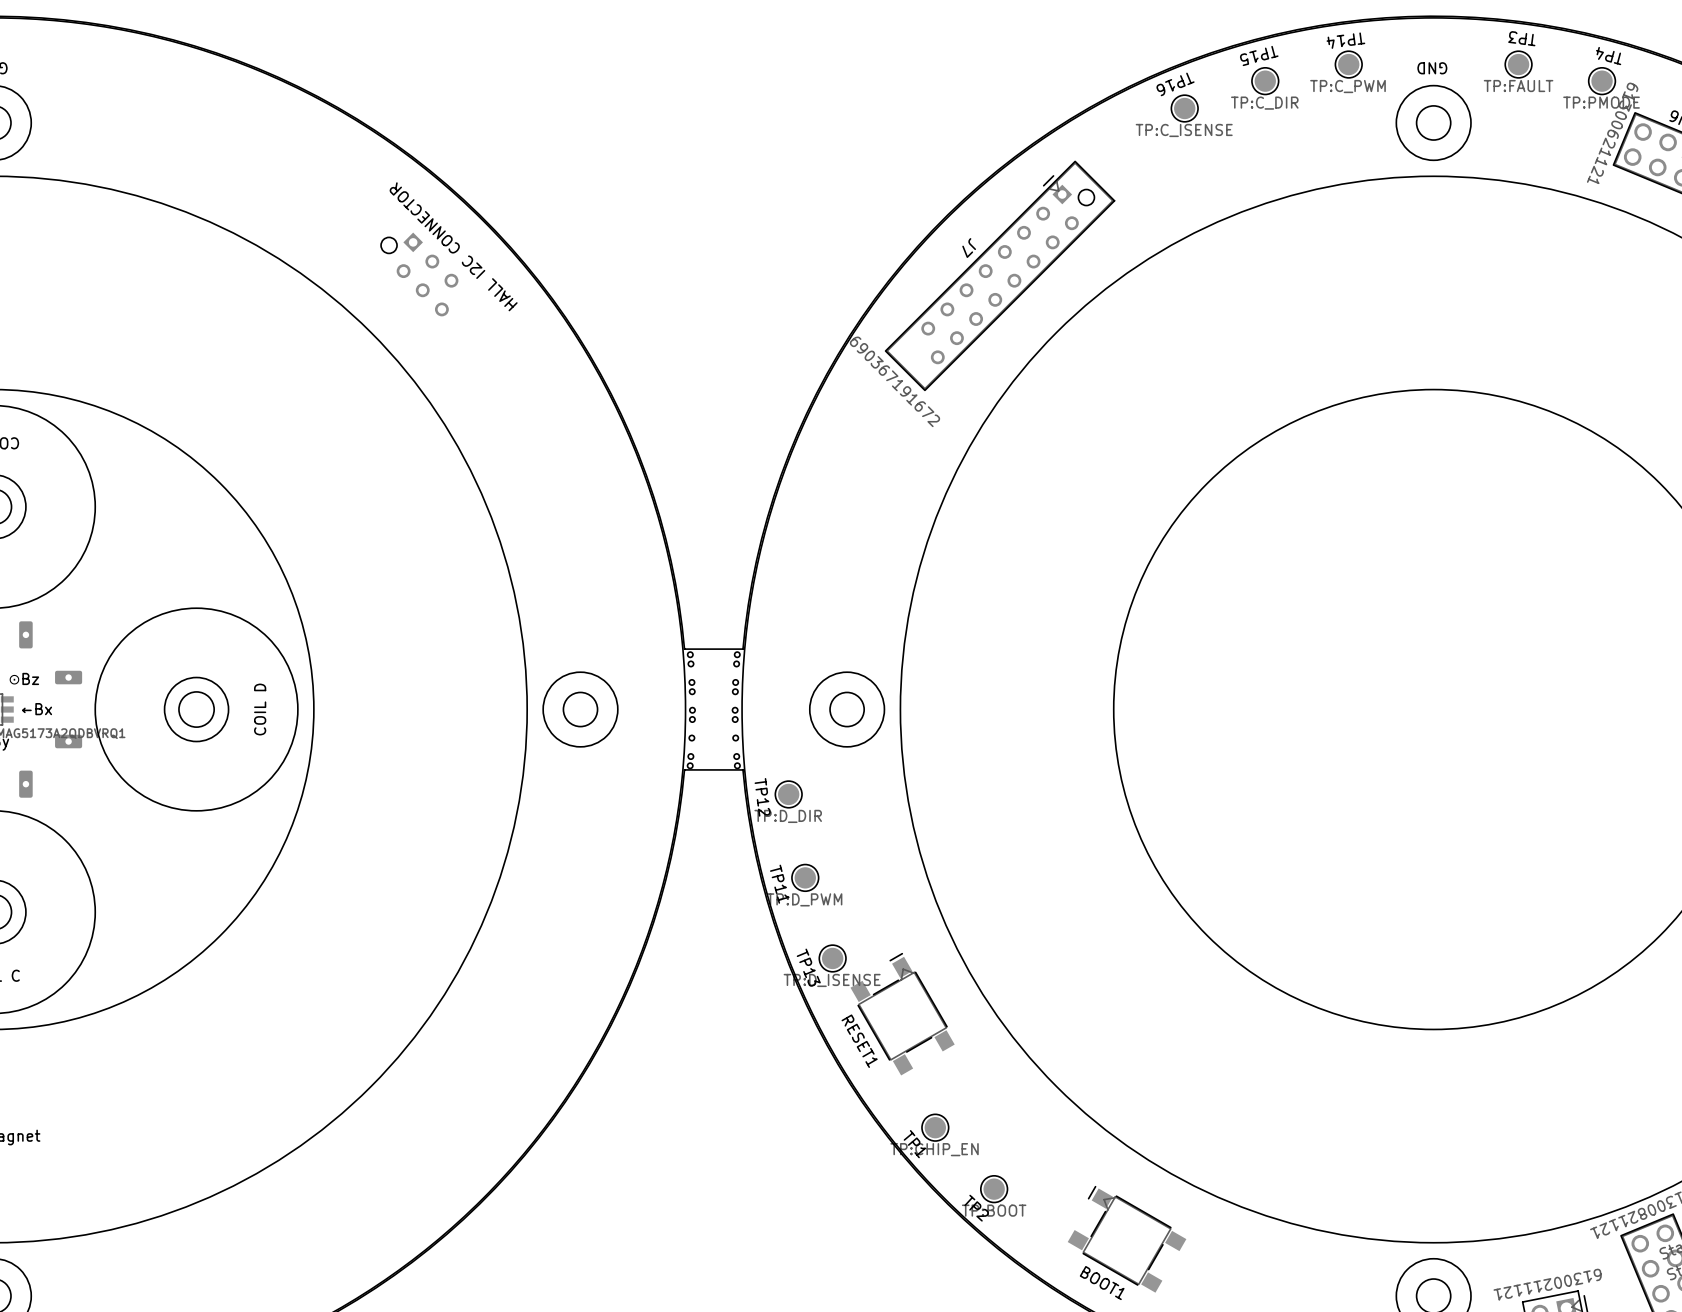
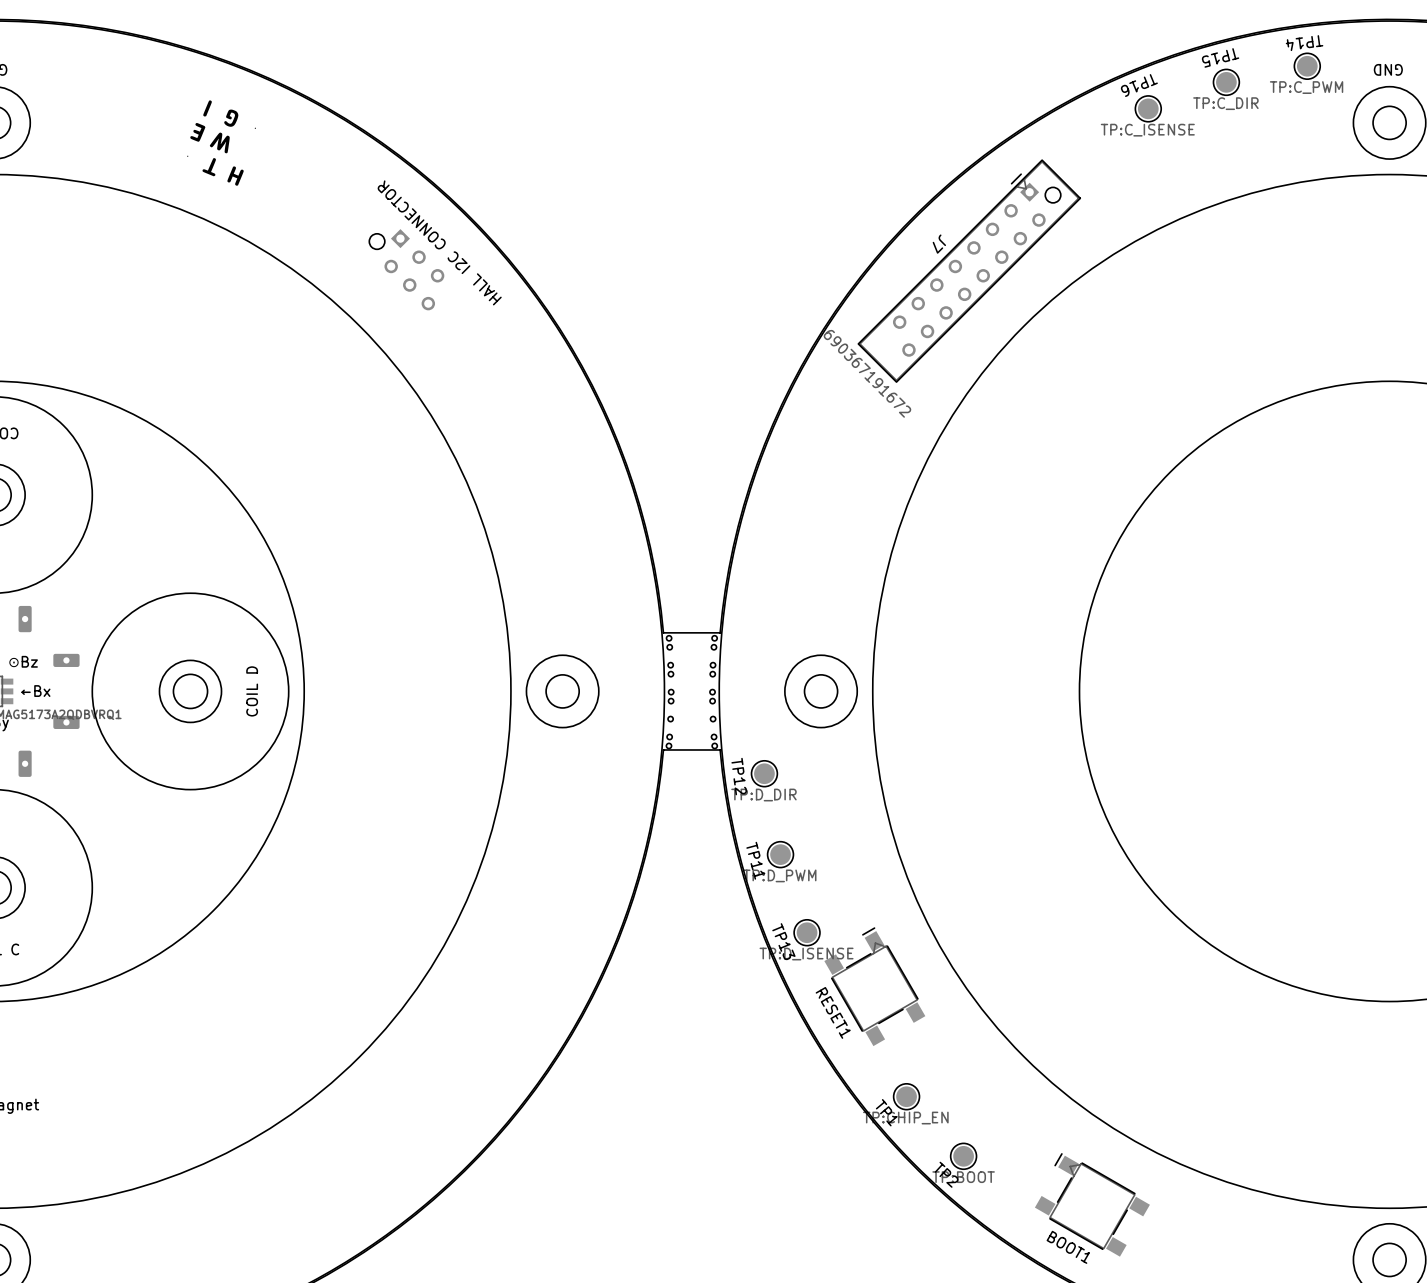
drawing: none -> [187, 100, 256, 186]

